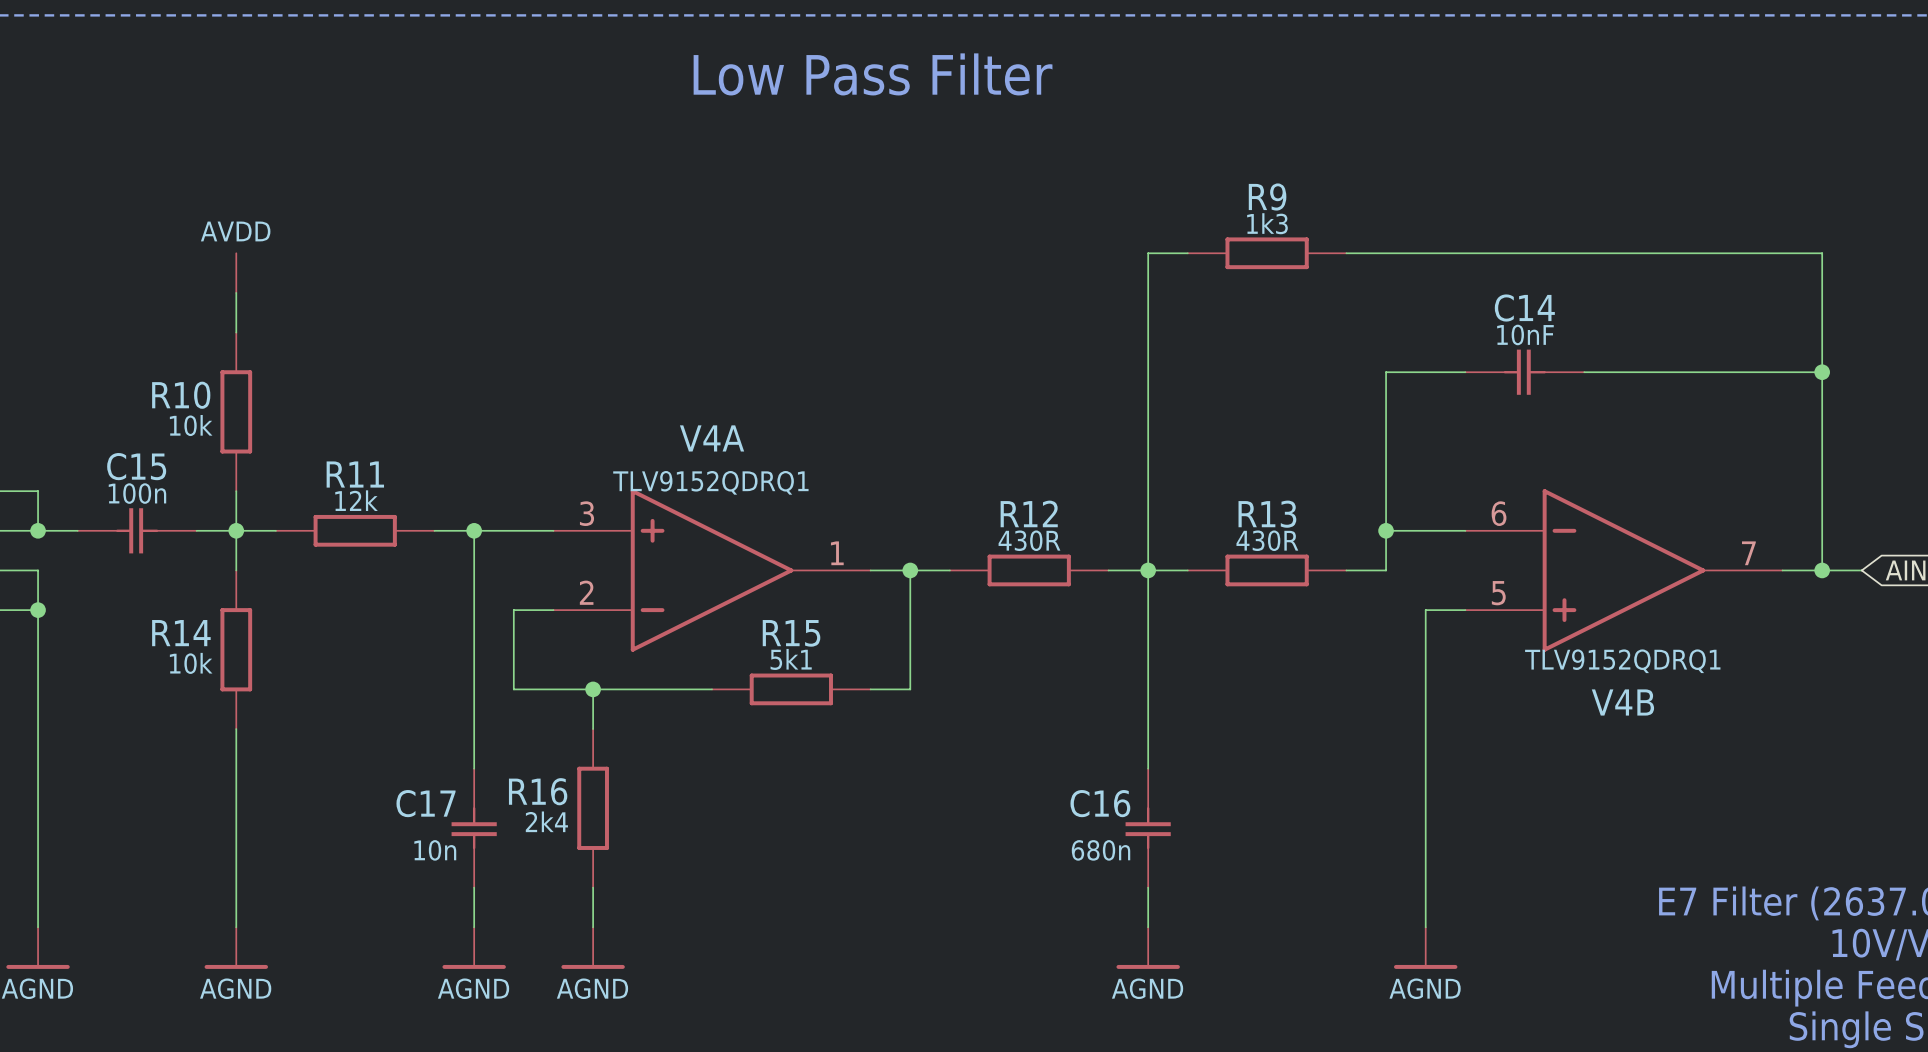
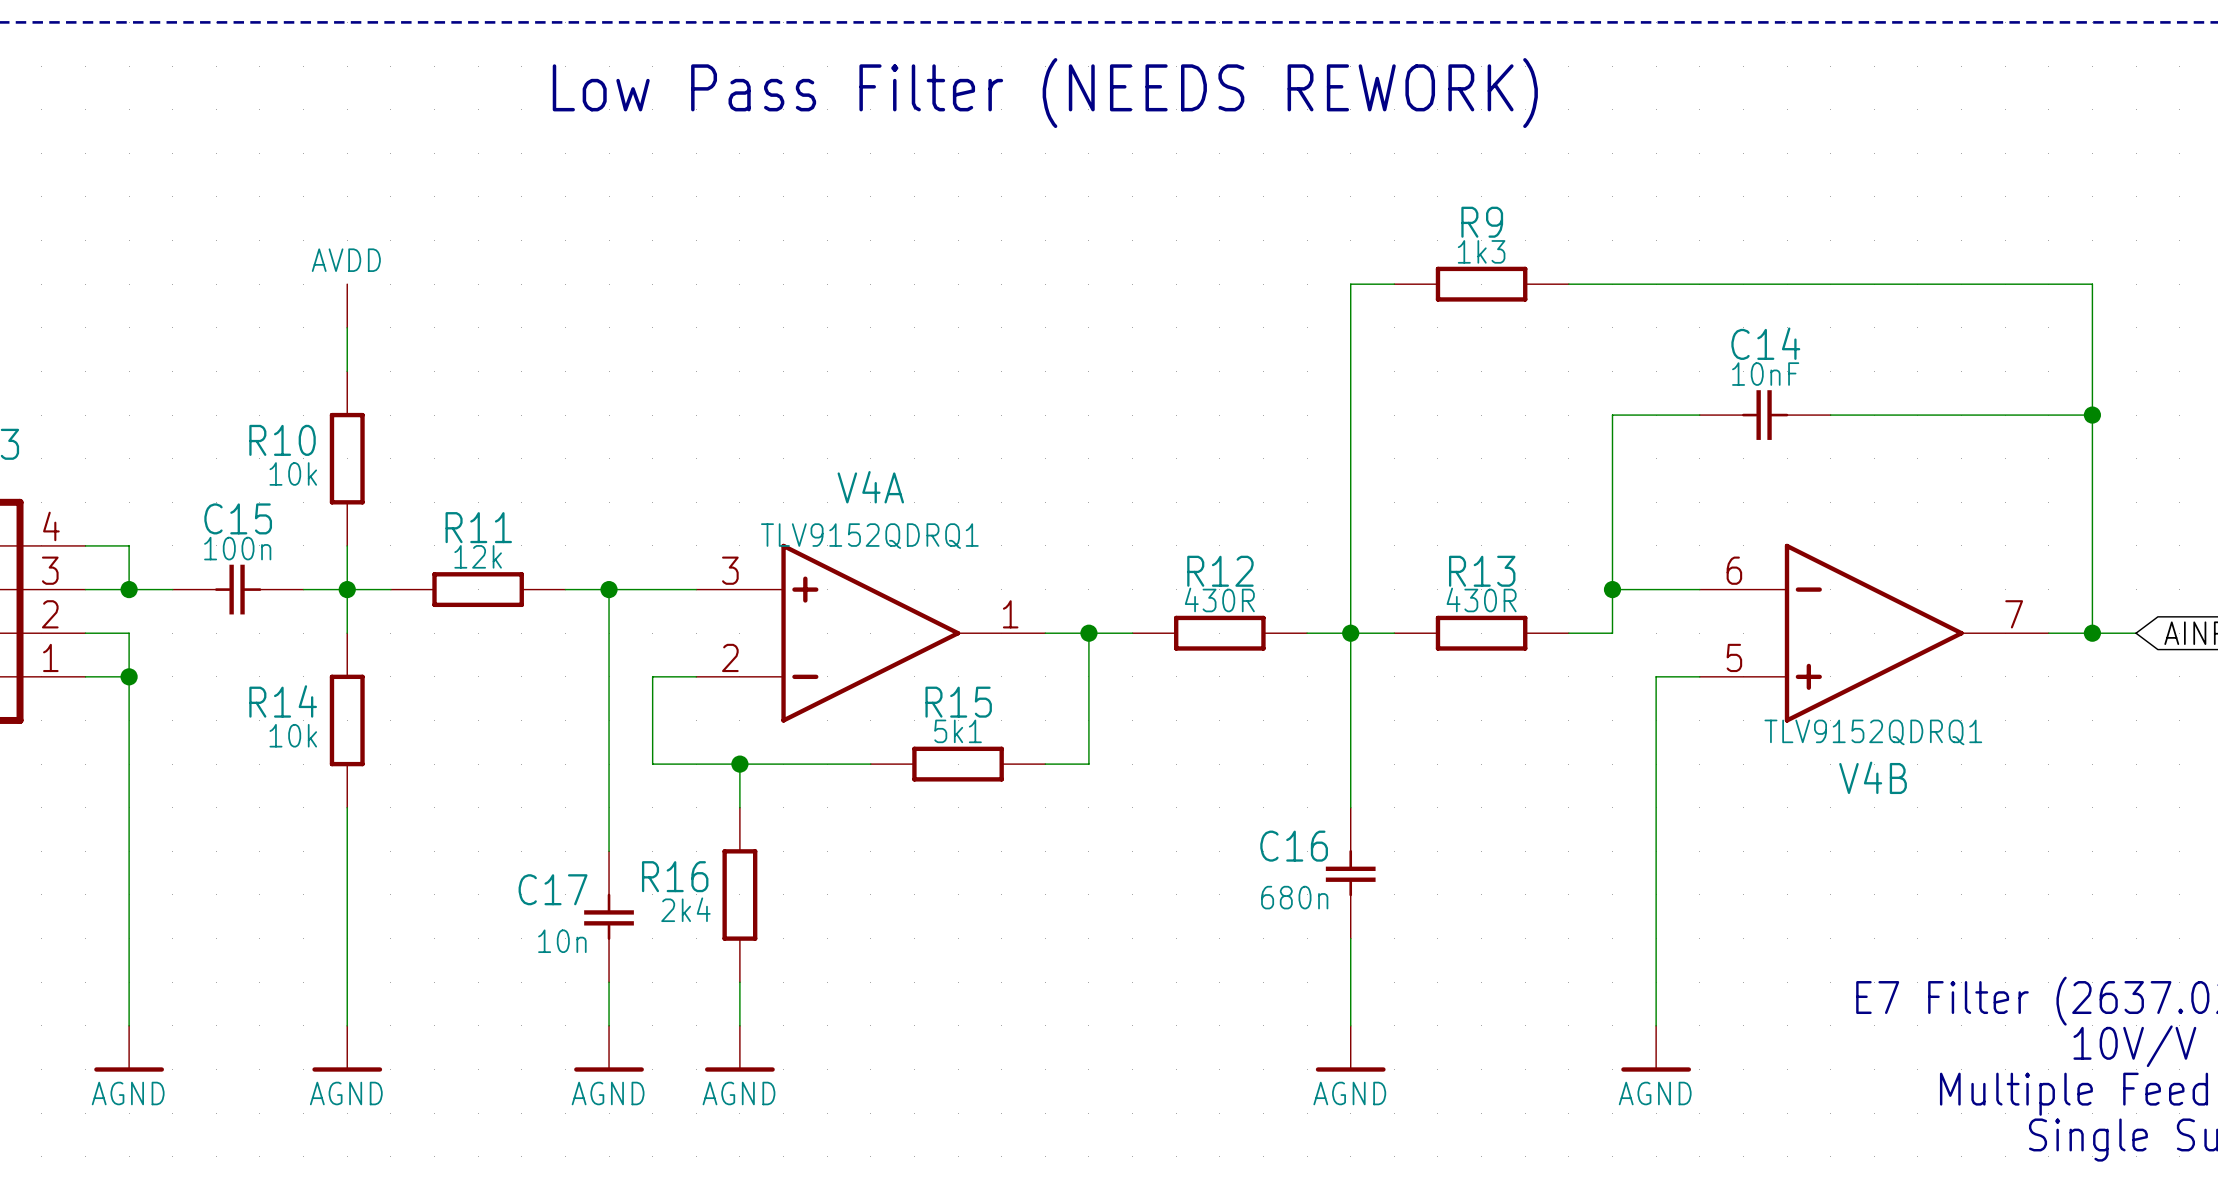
text: Low Pass Filter (873, 74) -> Low Pass Filter (NEEDS REWORK) (1045, 93)
C16 position: (1148, 828) -> (1350, 873)

